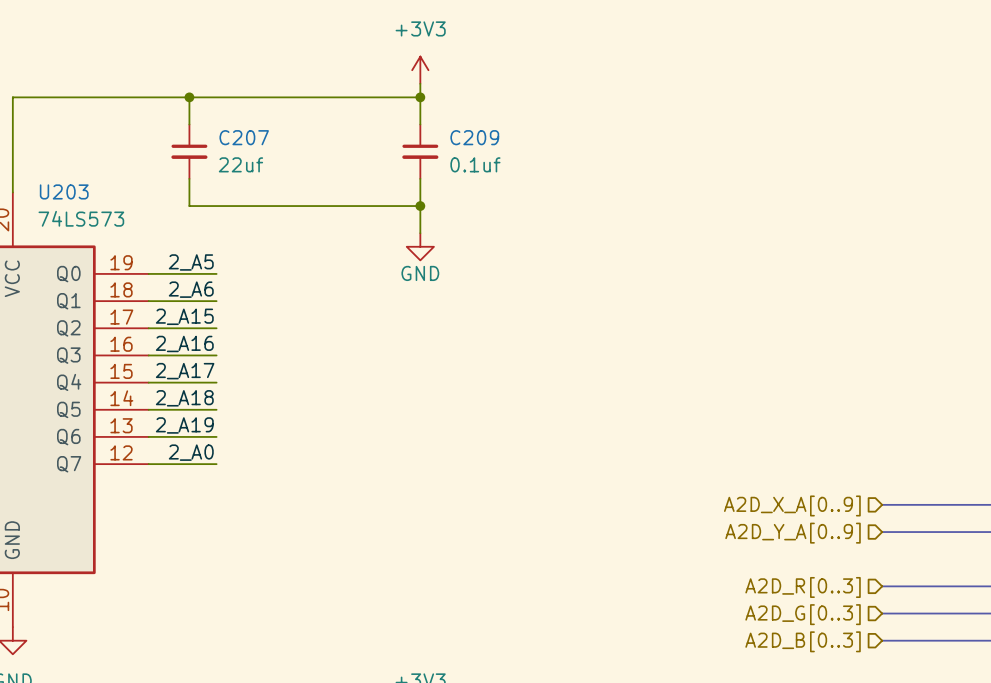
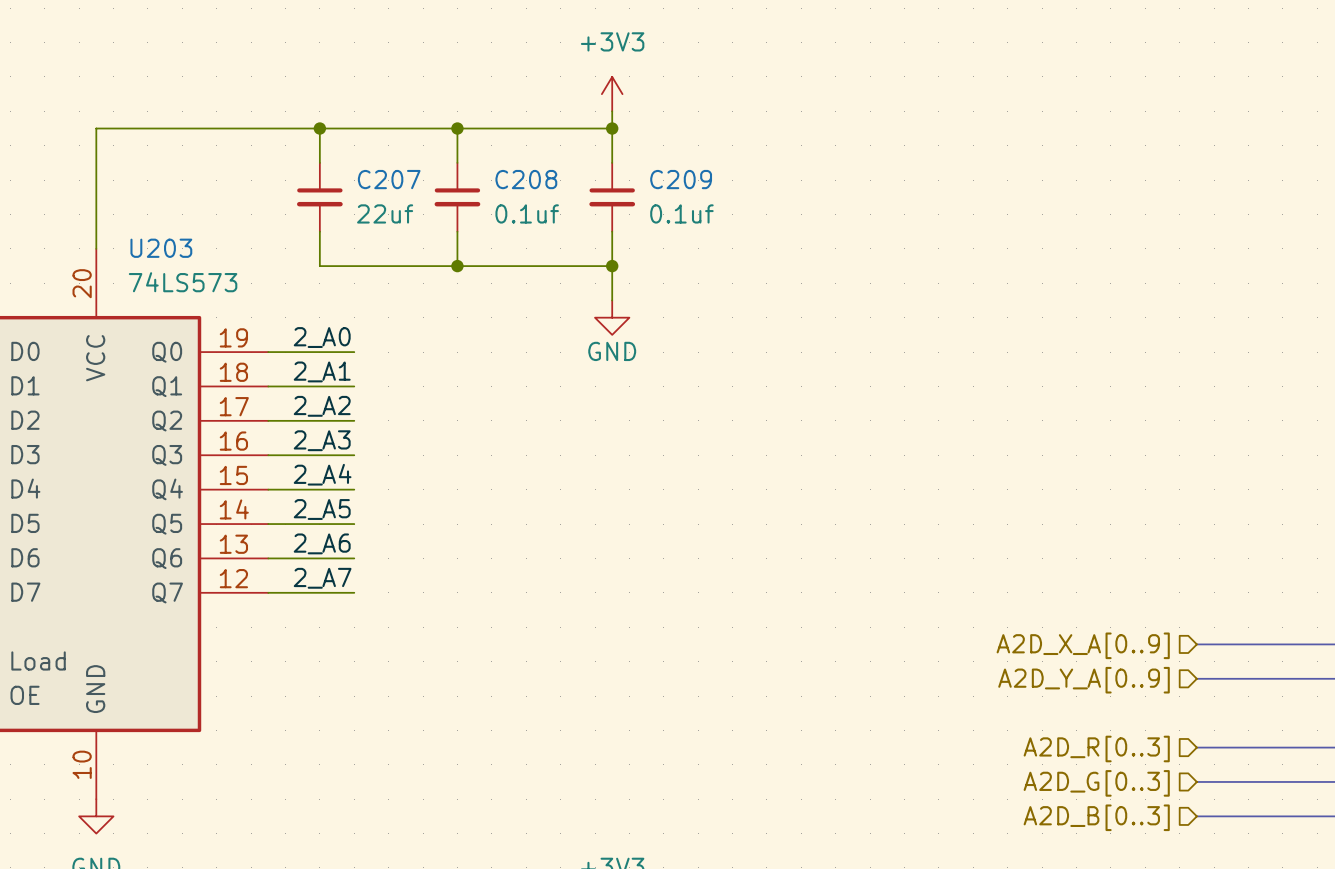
wire: none -> (457, 128) (457, 162)
junction: none -> (457, 128)
C208: none -> 0.1uf (457, 197)
wire: none -> (457, 231) (457, 266)
junction: none -> (457, 266)
label: 2_A5 (191, 262) -> 2_A0 (322, 337)
label: 2_A6 (191, 289) -> 2_A1 (322, 371)
label: 2_A15 (184, 316) -> 2_A2 (322, 406)
label: 2_A16 (184, 343) -> 2_A3 (322, 440)
label: 2_A17 (185, 371) -> 2_A4 (322, 474)
label: 2_A18 (184, 398) -> 2_A5 (322, 509)
label: 2_A19 (184, 425) -> 2_A6 (322, 543)
label: 2_A0 (191, 452) -> 2_A7 (322, 578)

